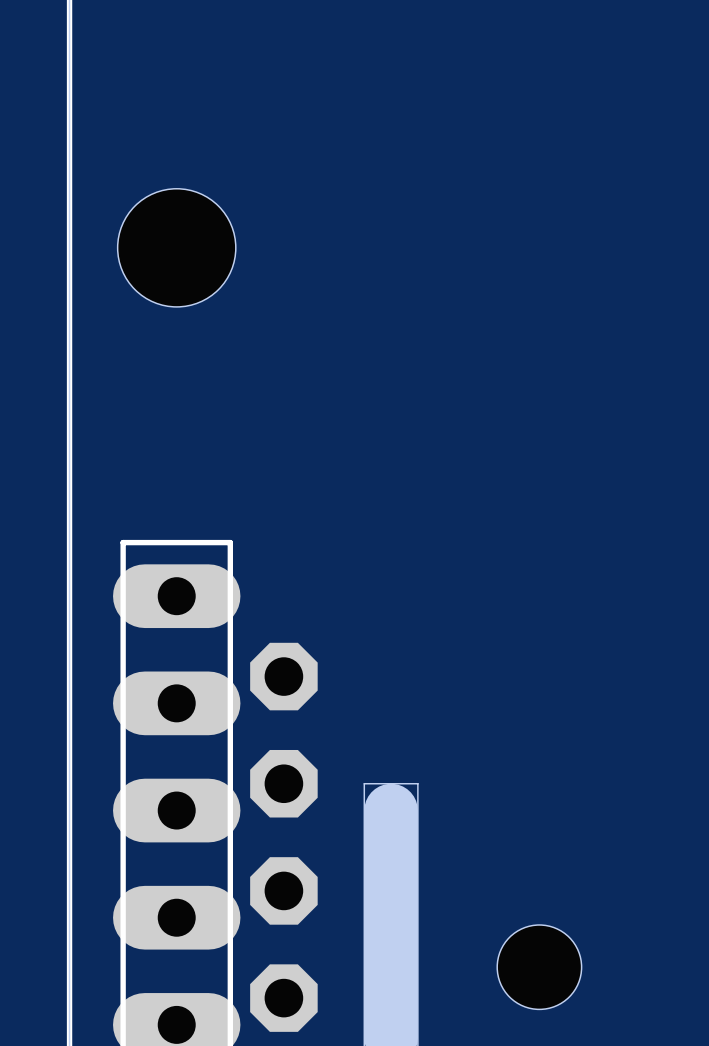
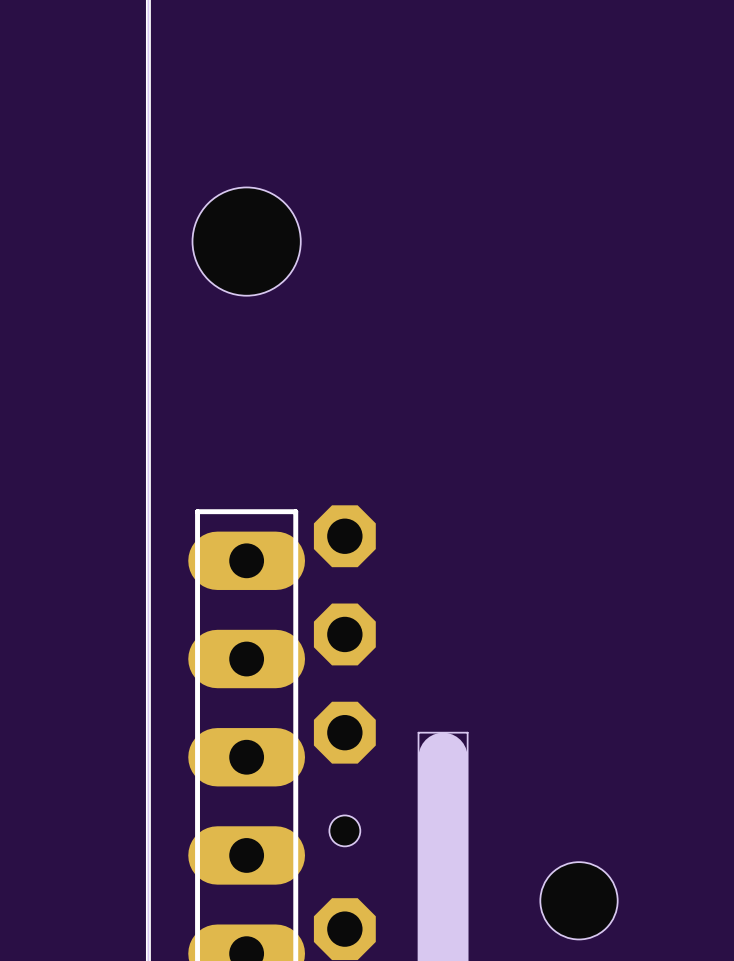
part position: (283, 890) -> (344, 536)
hole: none -> (344, 830)

